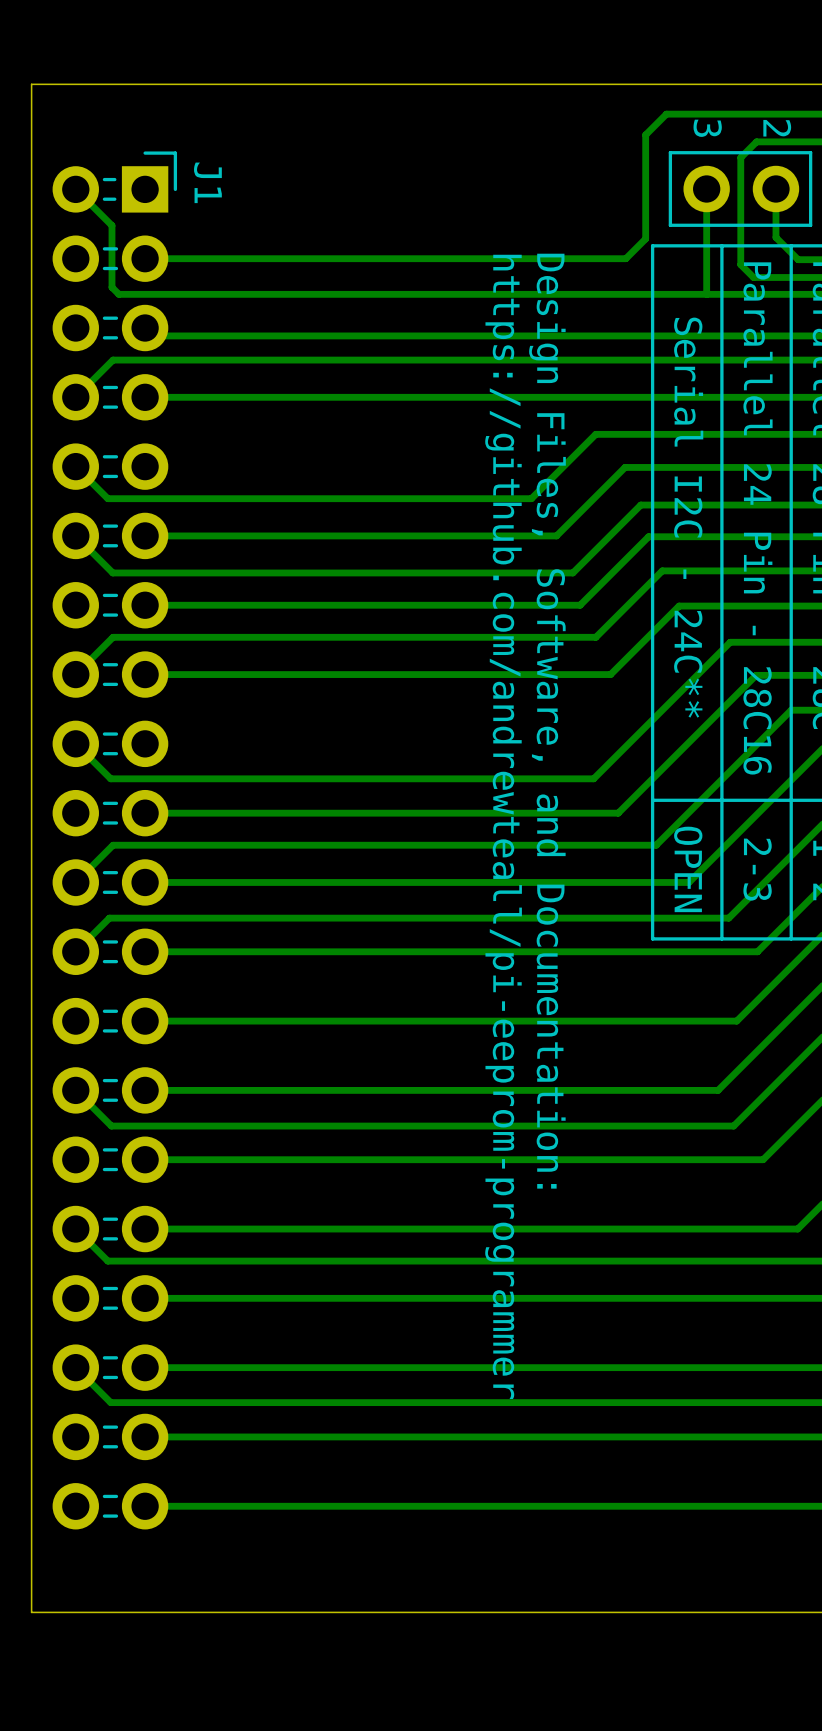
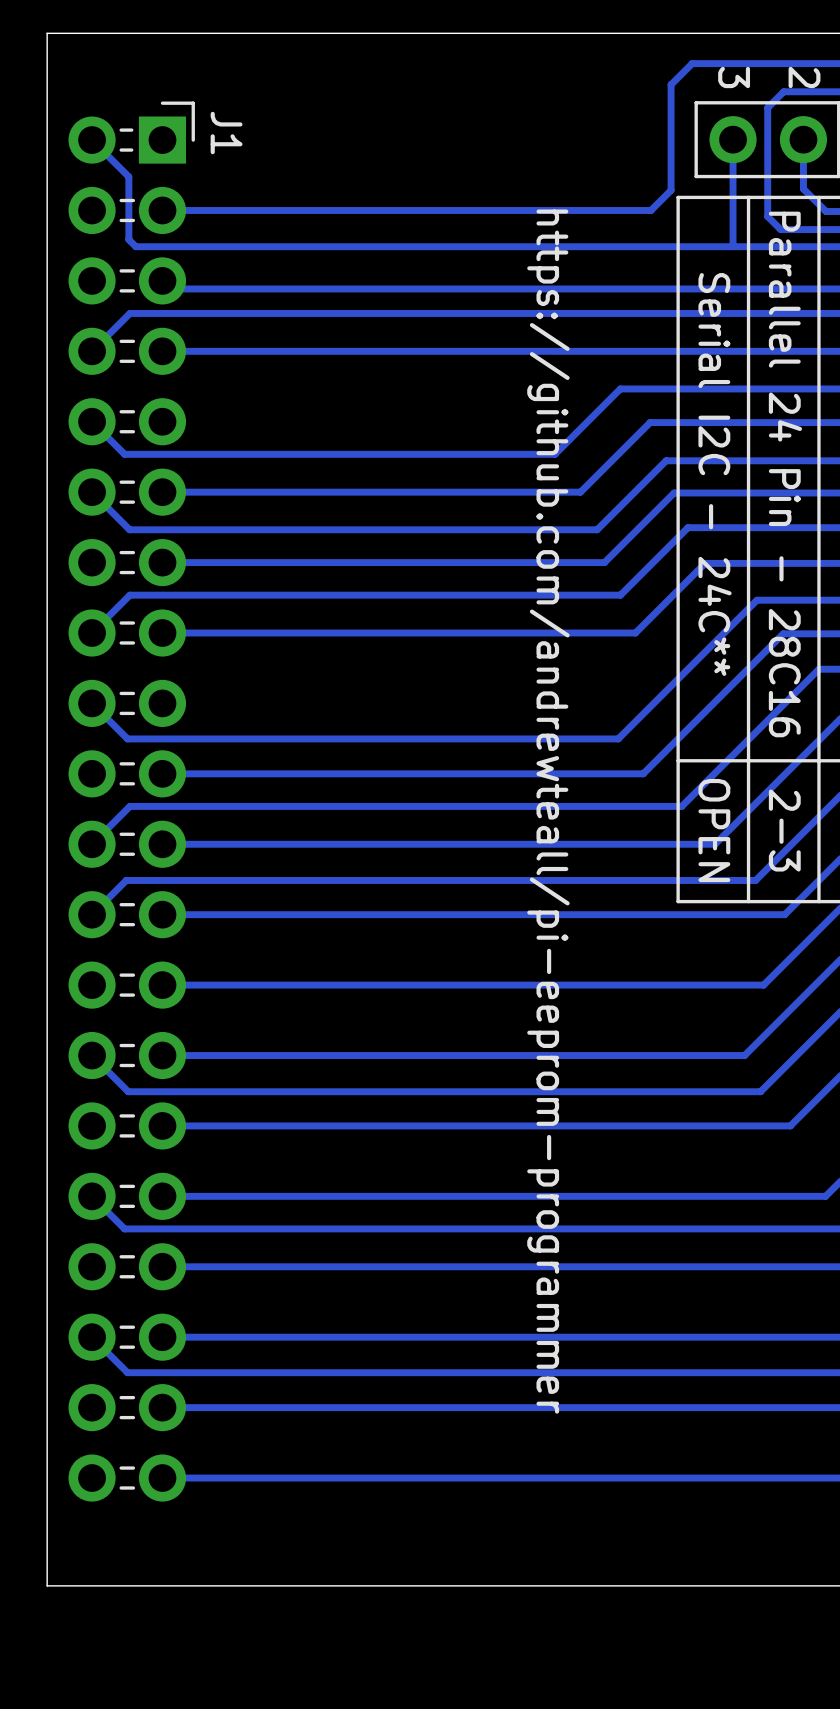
text: Design Files, Software, and Documentation: (547, 721) -> none
text position: https://github.com/andrewteall/pi-eeprom-programmer (503, 826) -> https://github.com/andrewteall/pi-eeprom-programmer (548, 811)

